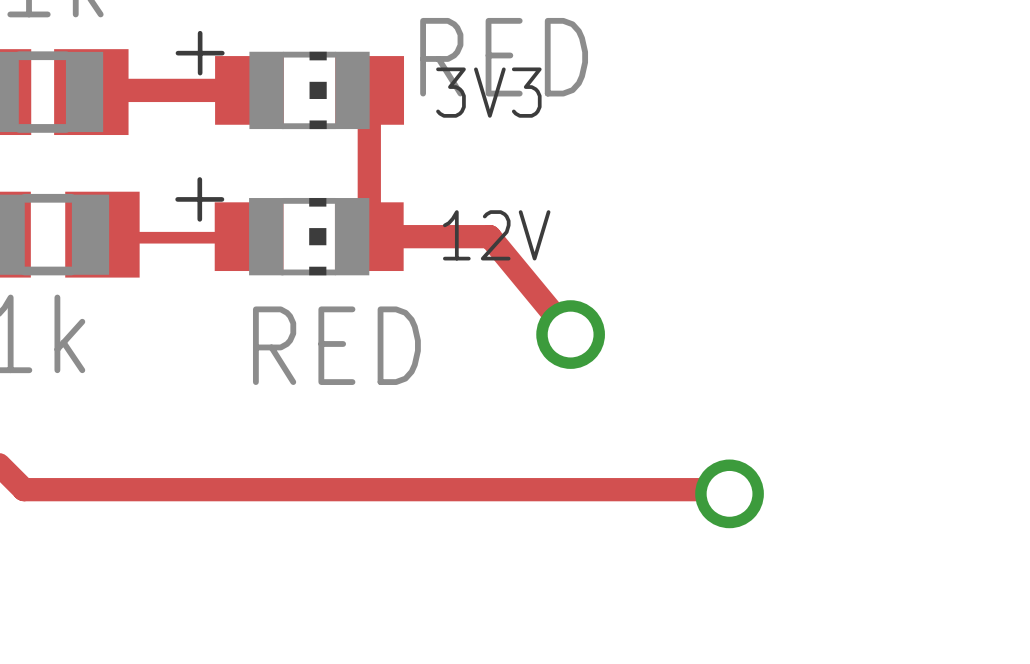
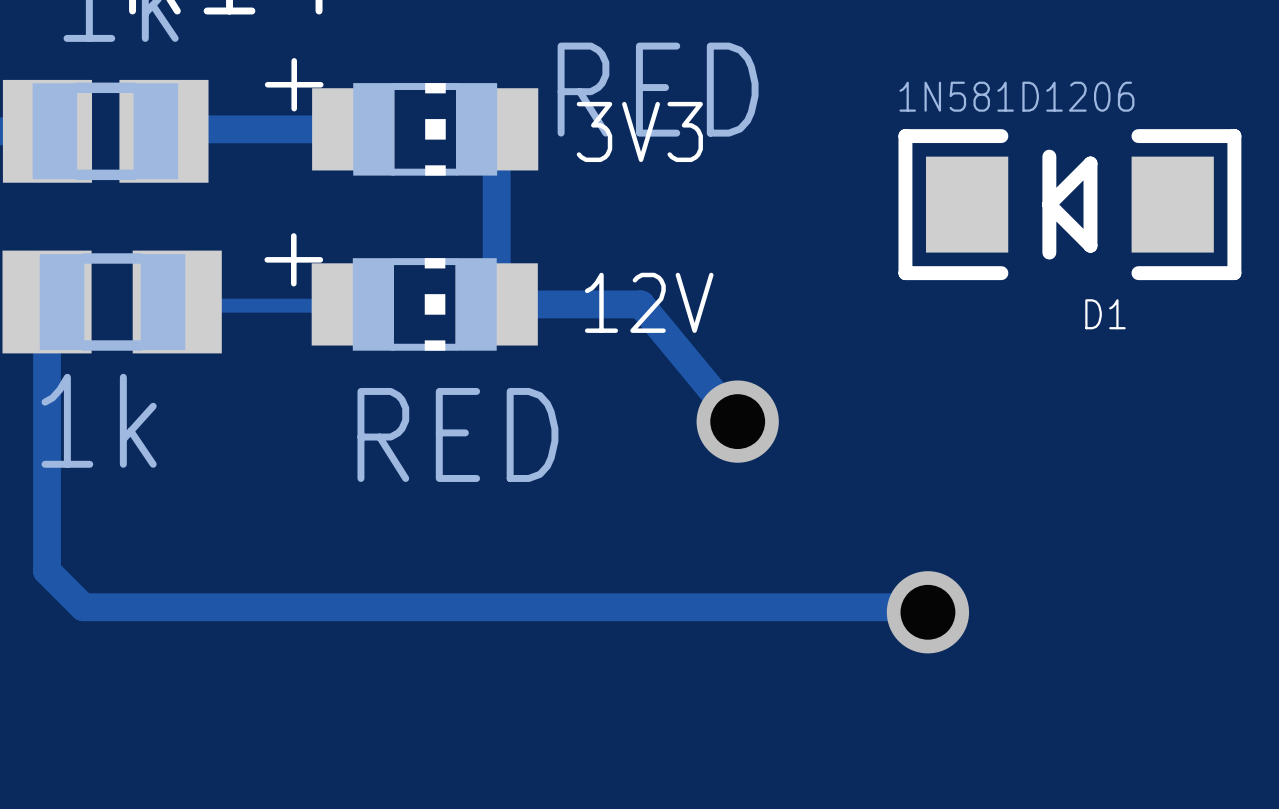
D1: none -> 1N581D1206 (1069, 204)

